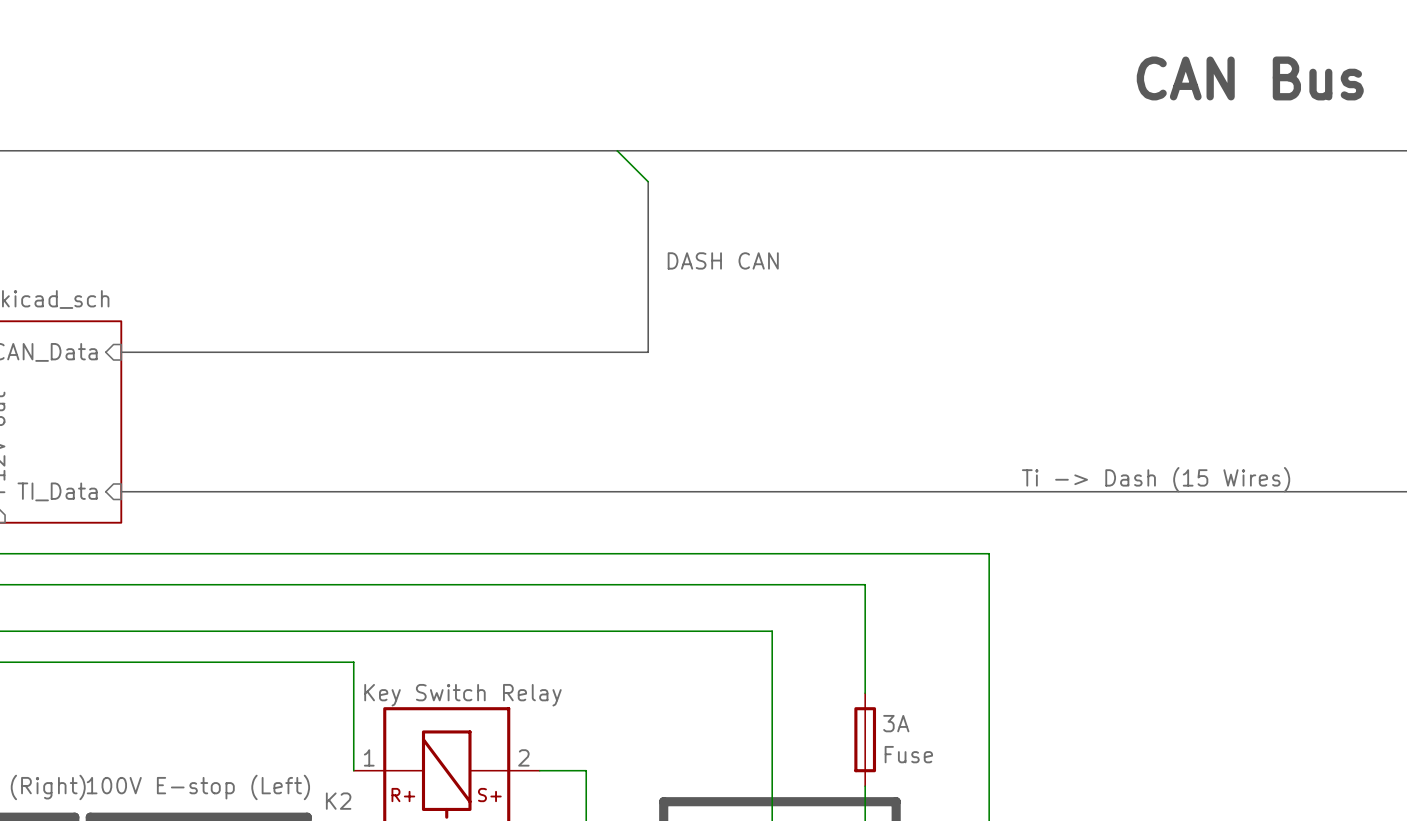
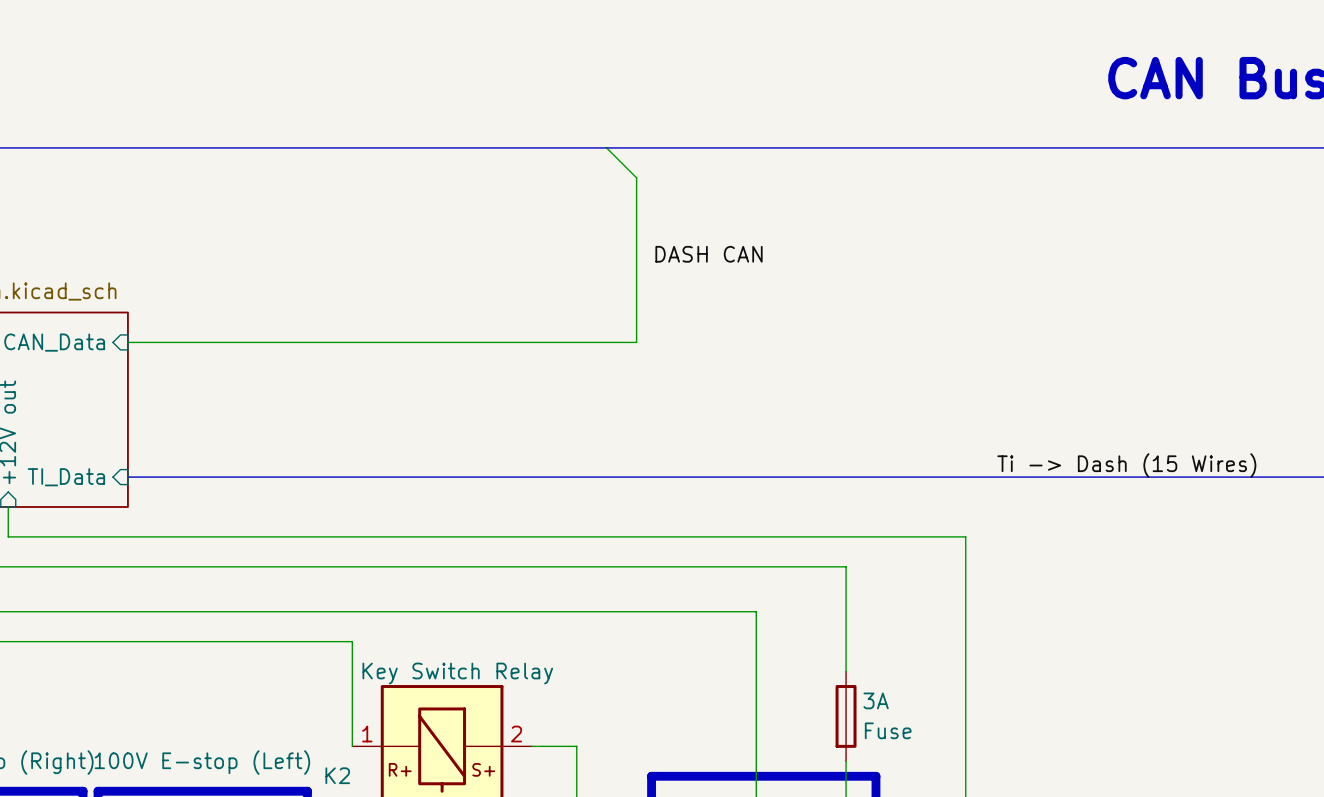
bus: (648, 181) (648, 352) (121, 352) -> none

